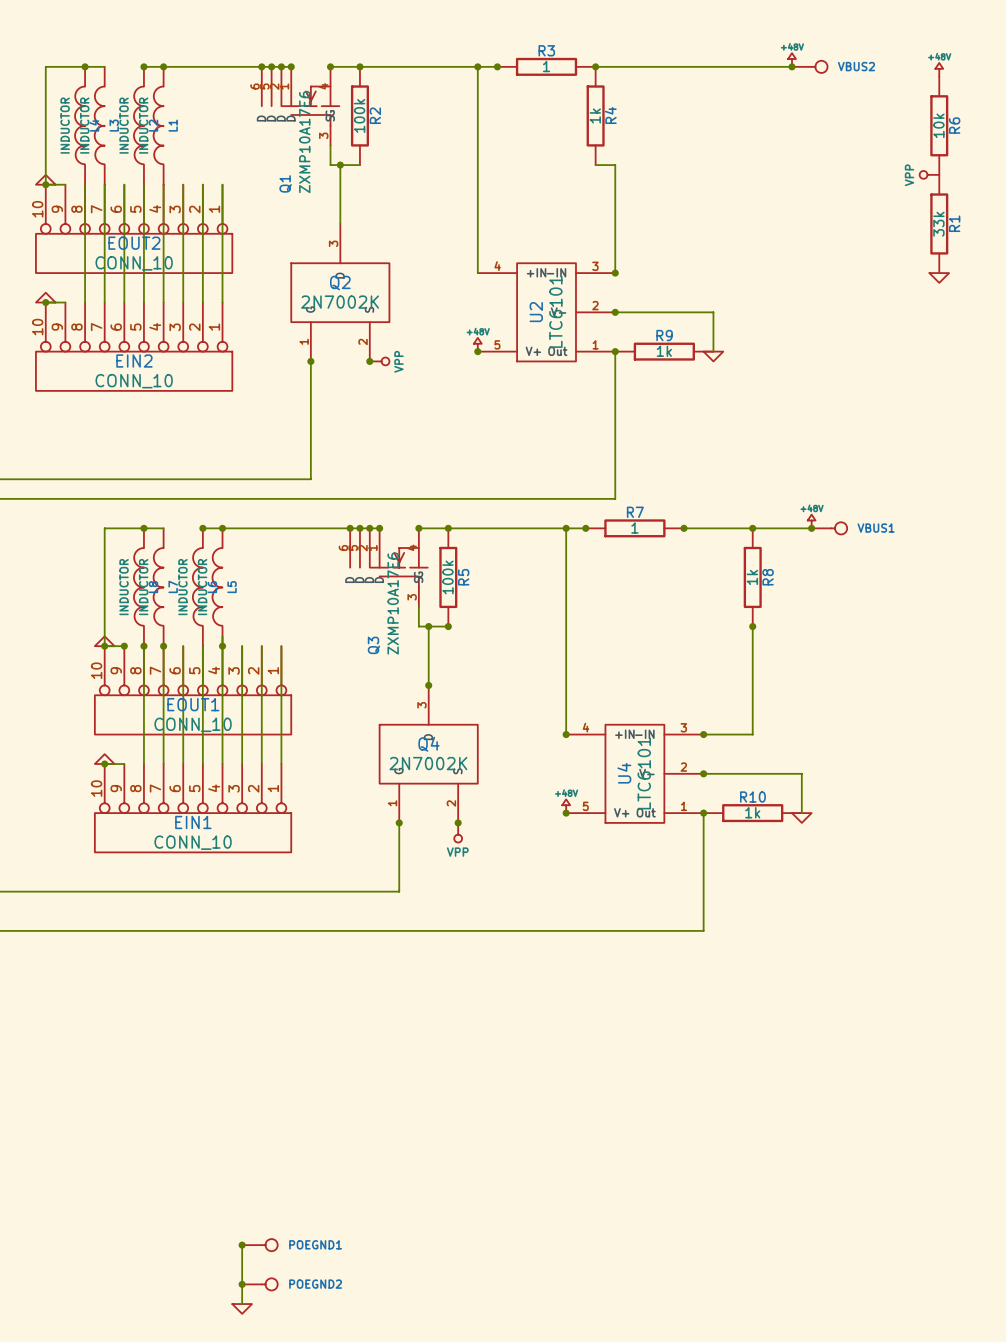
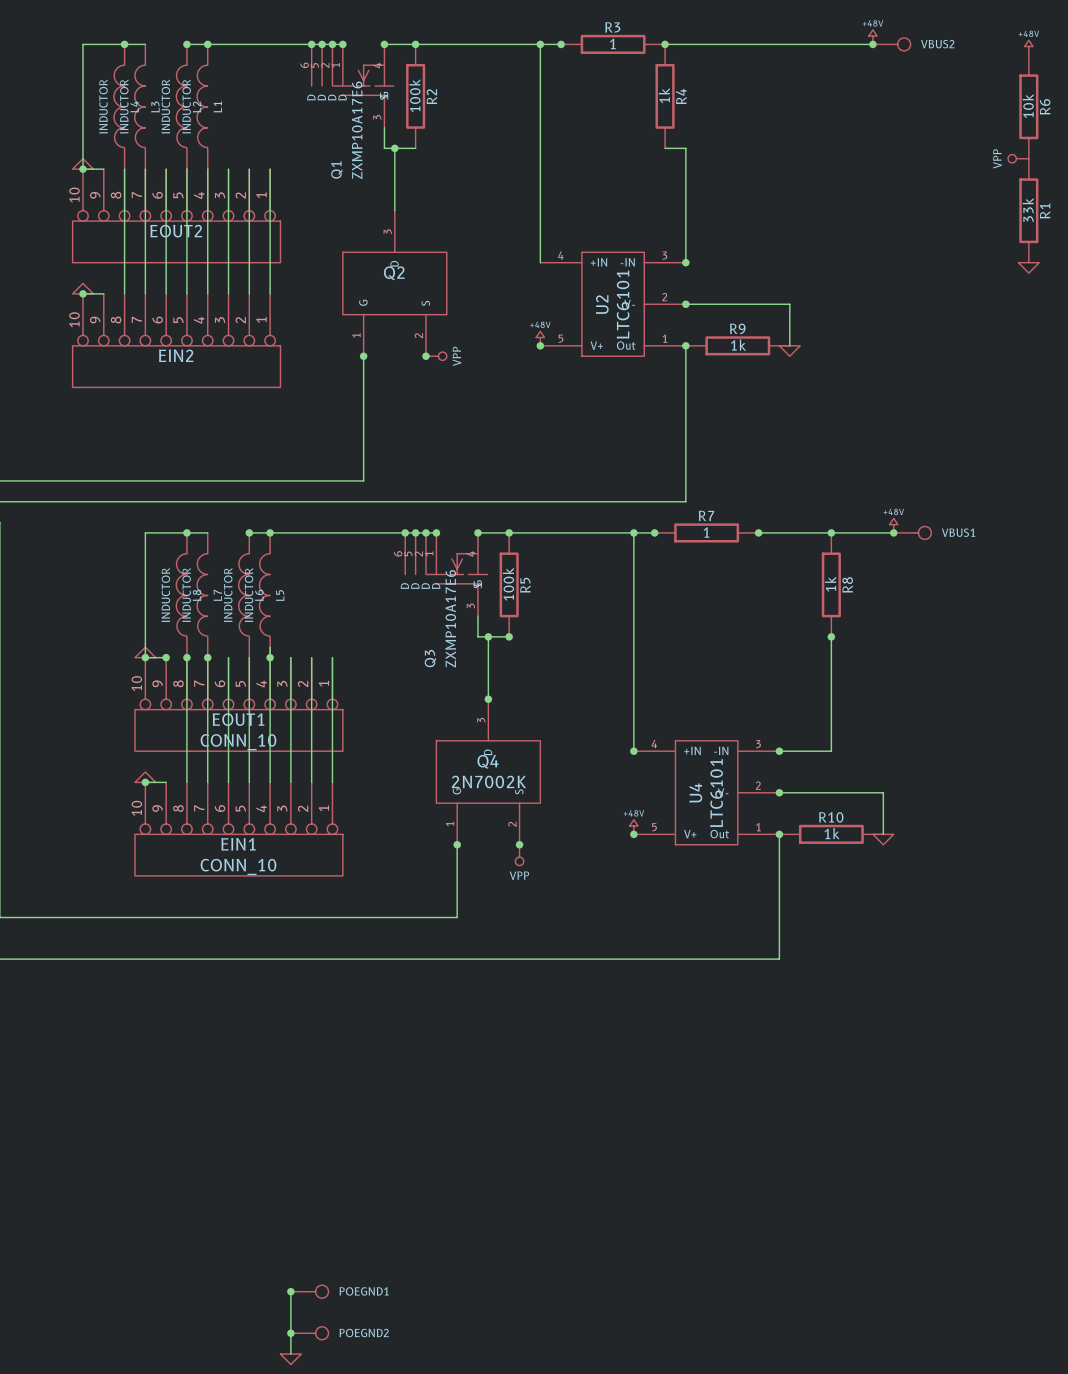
EOUT2 value: CONN_10 (134, 263) -> none
Q2 value: 2N7002K (340, 302) -> none
EIN2 value: CONN_10 (134, 381) -> none

